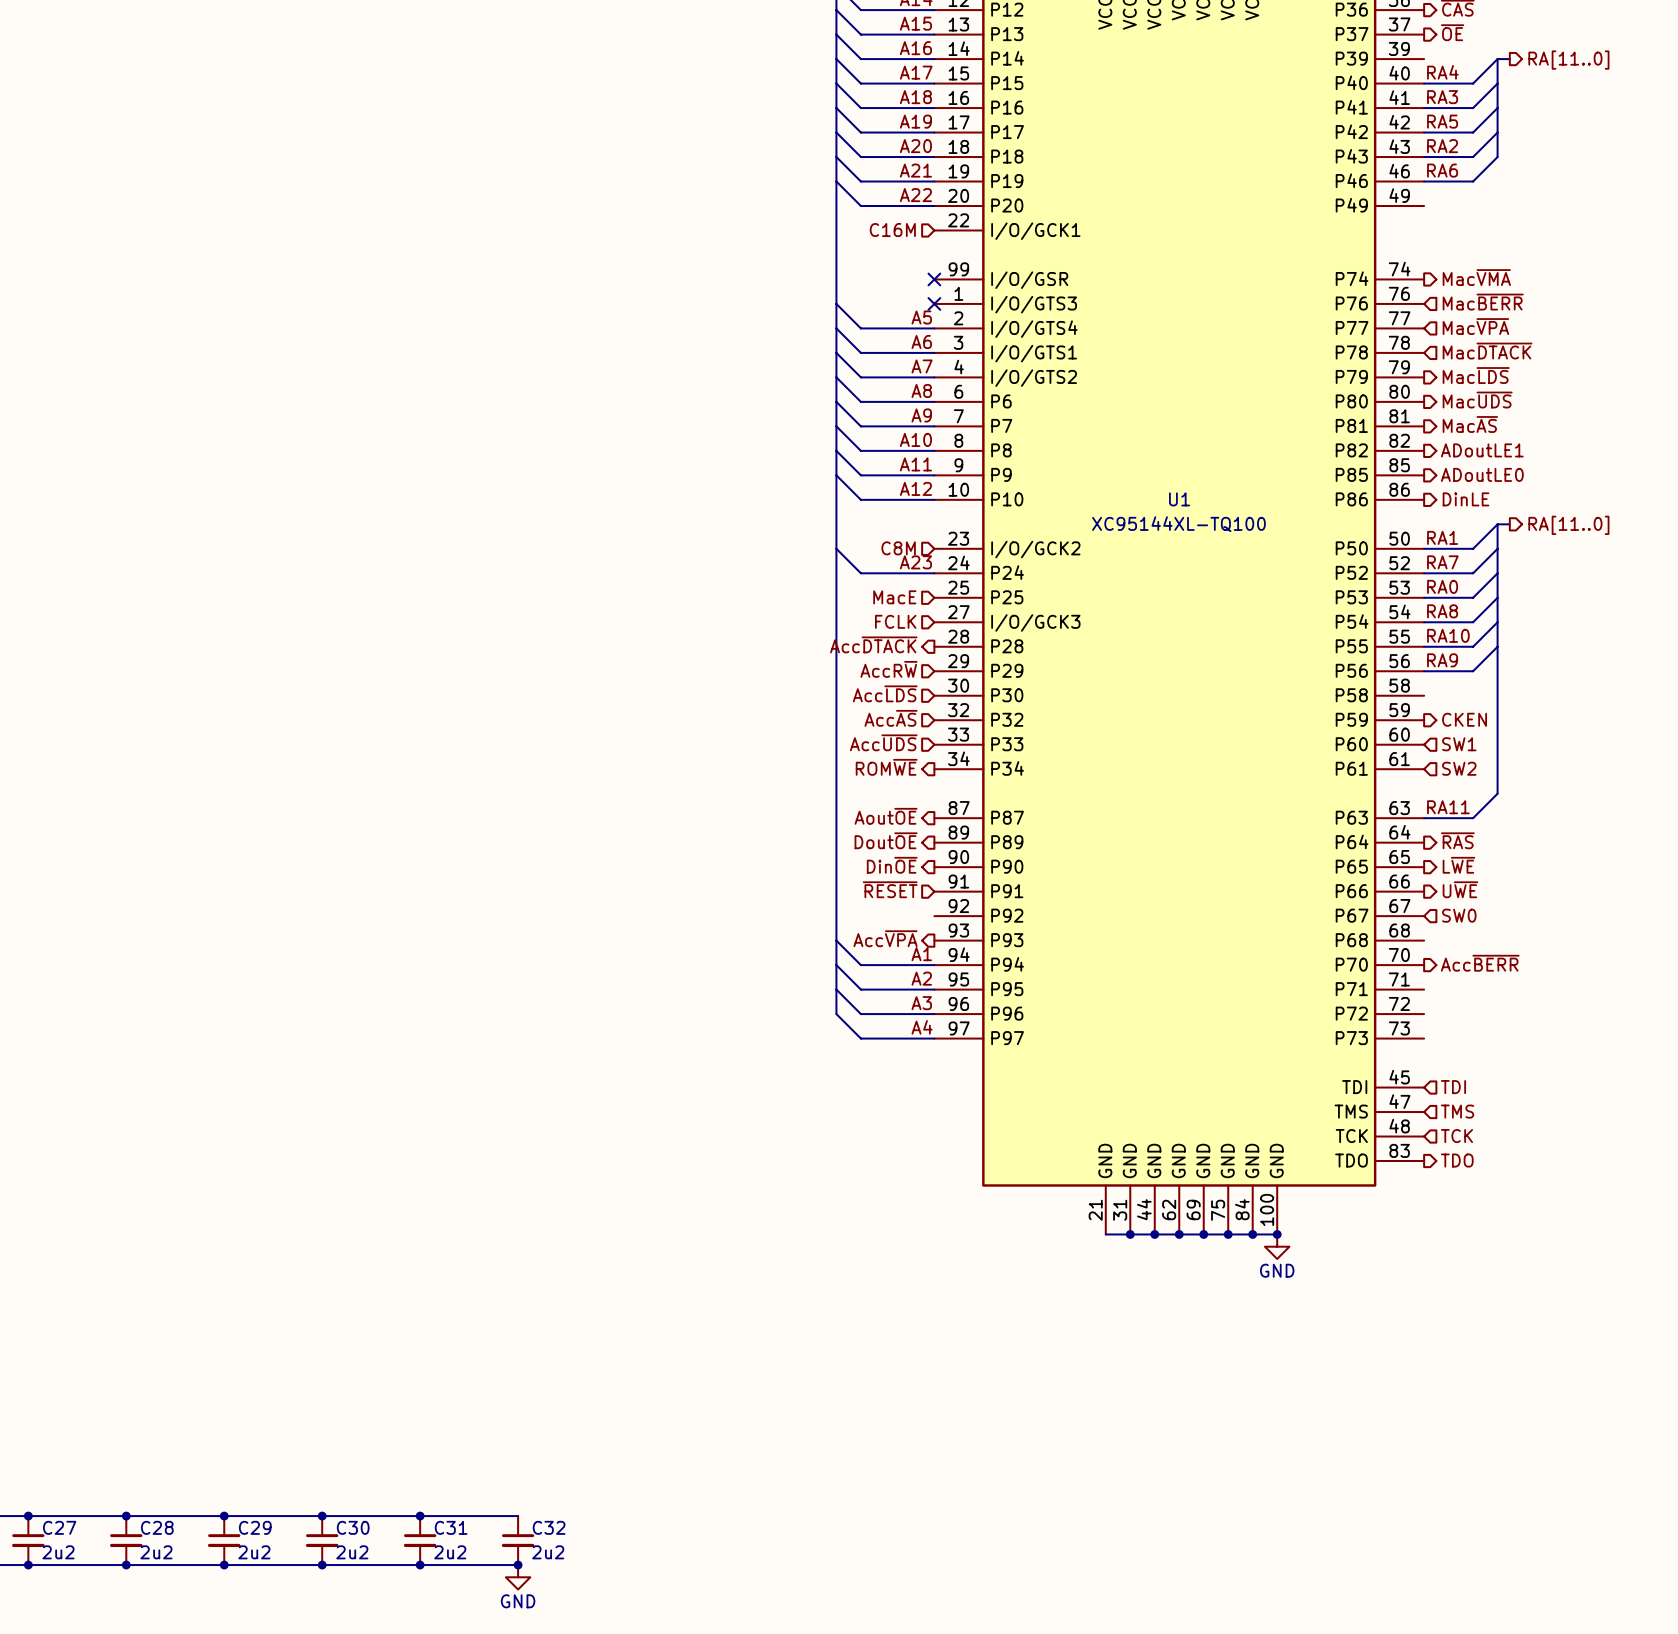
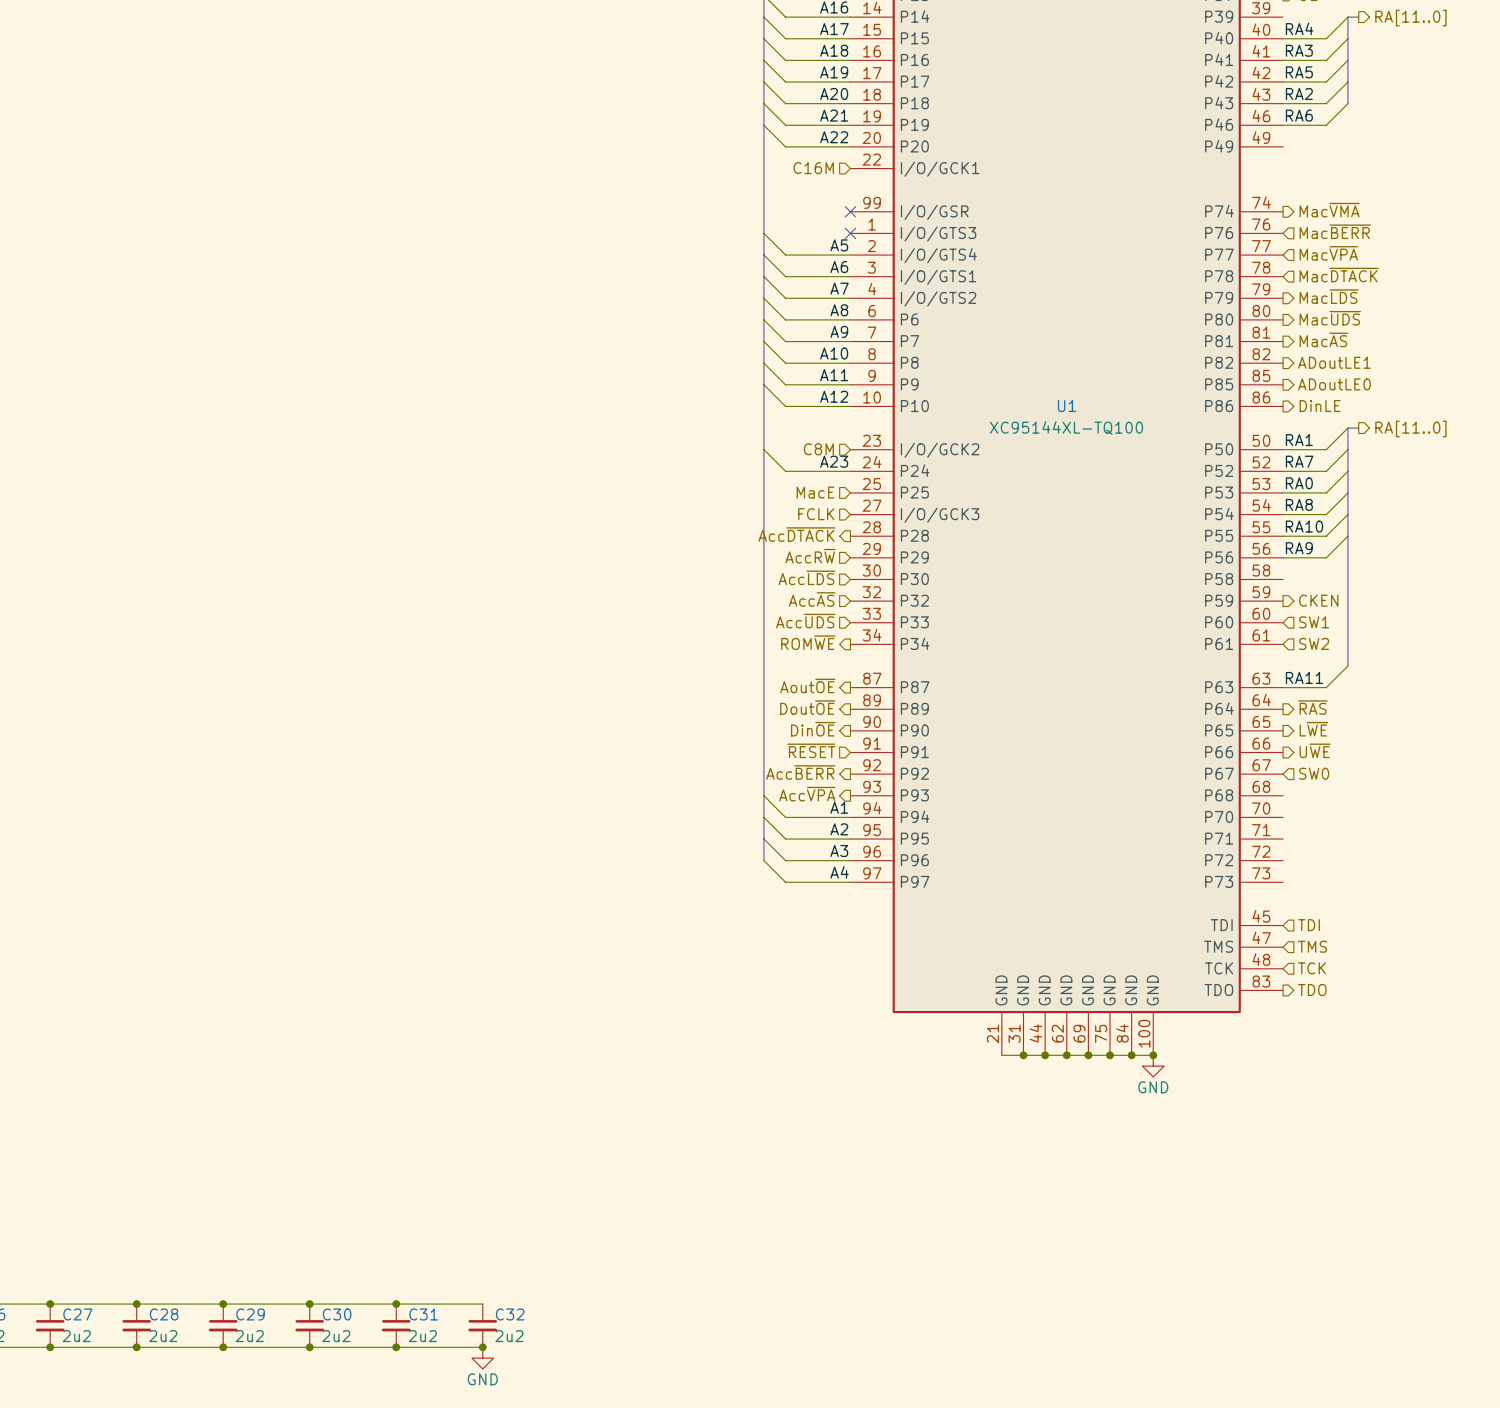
hierarchical label: none -> Acc~{BERR} (800, 772)
hierarchical label: Acc~{BERR} (1480, 963) -> none

